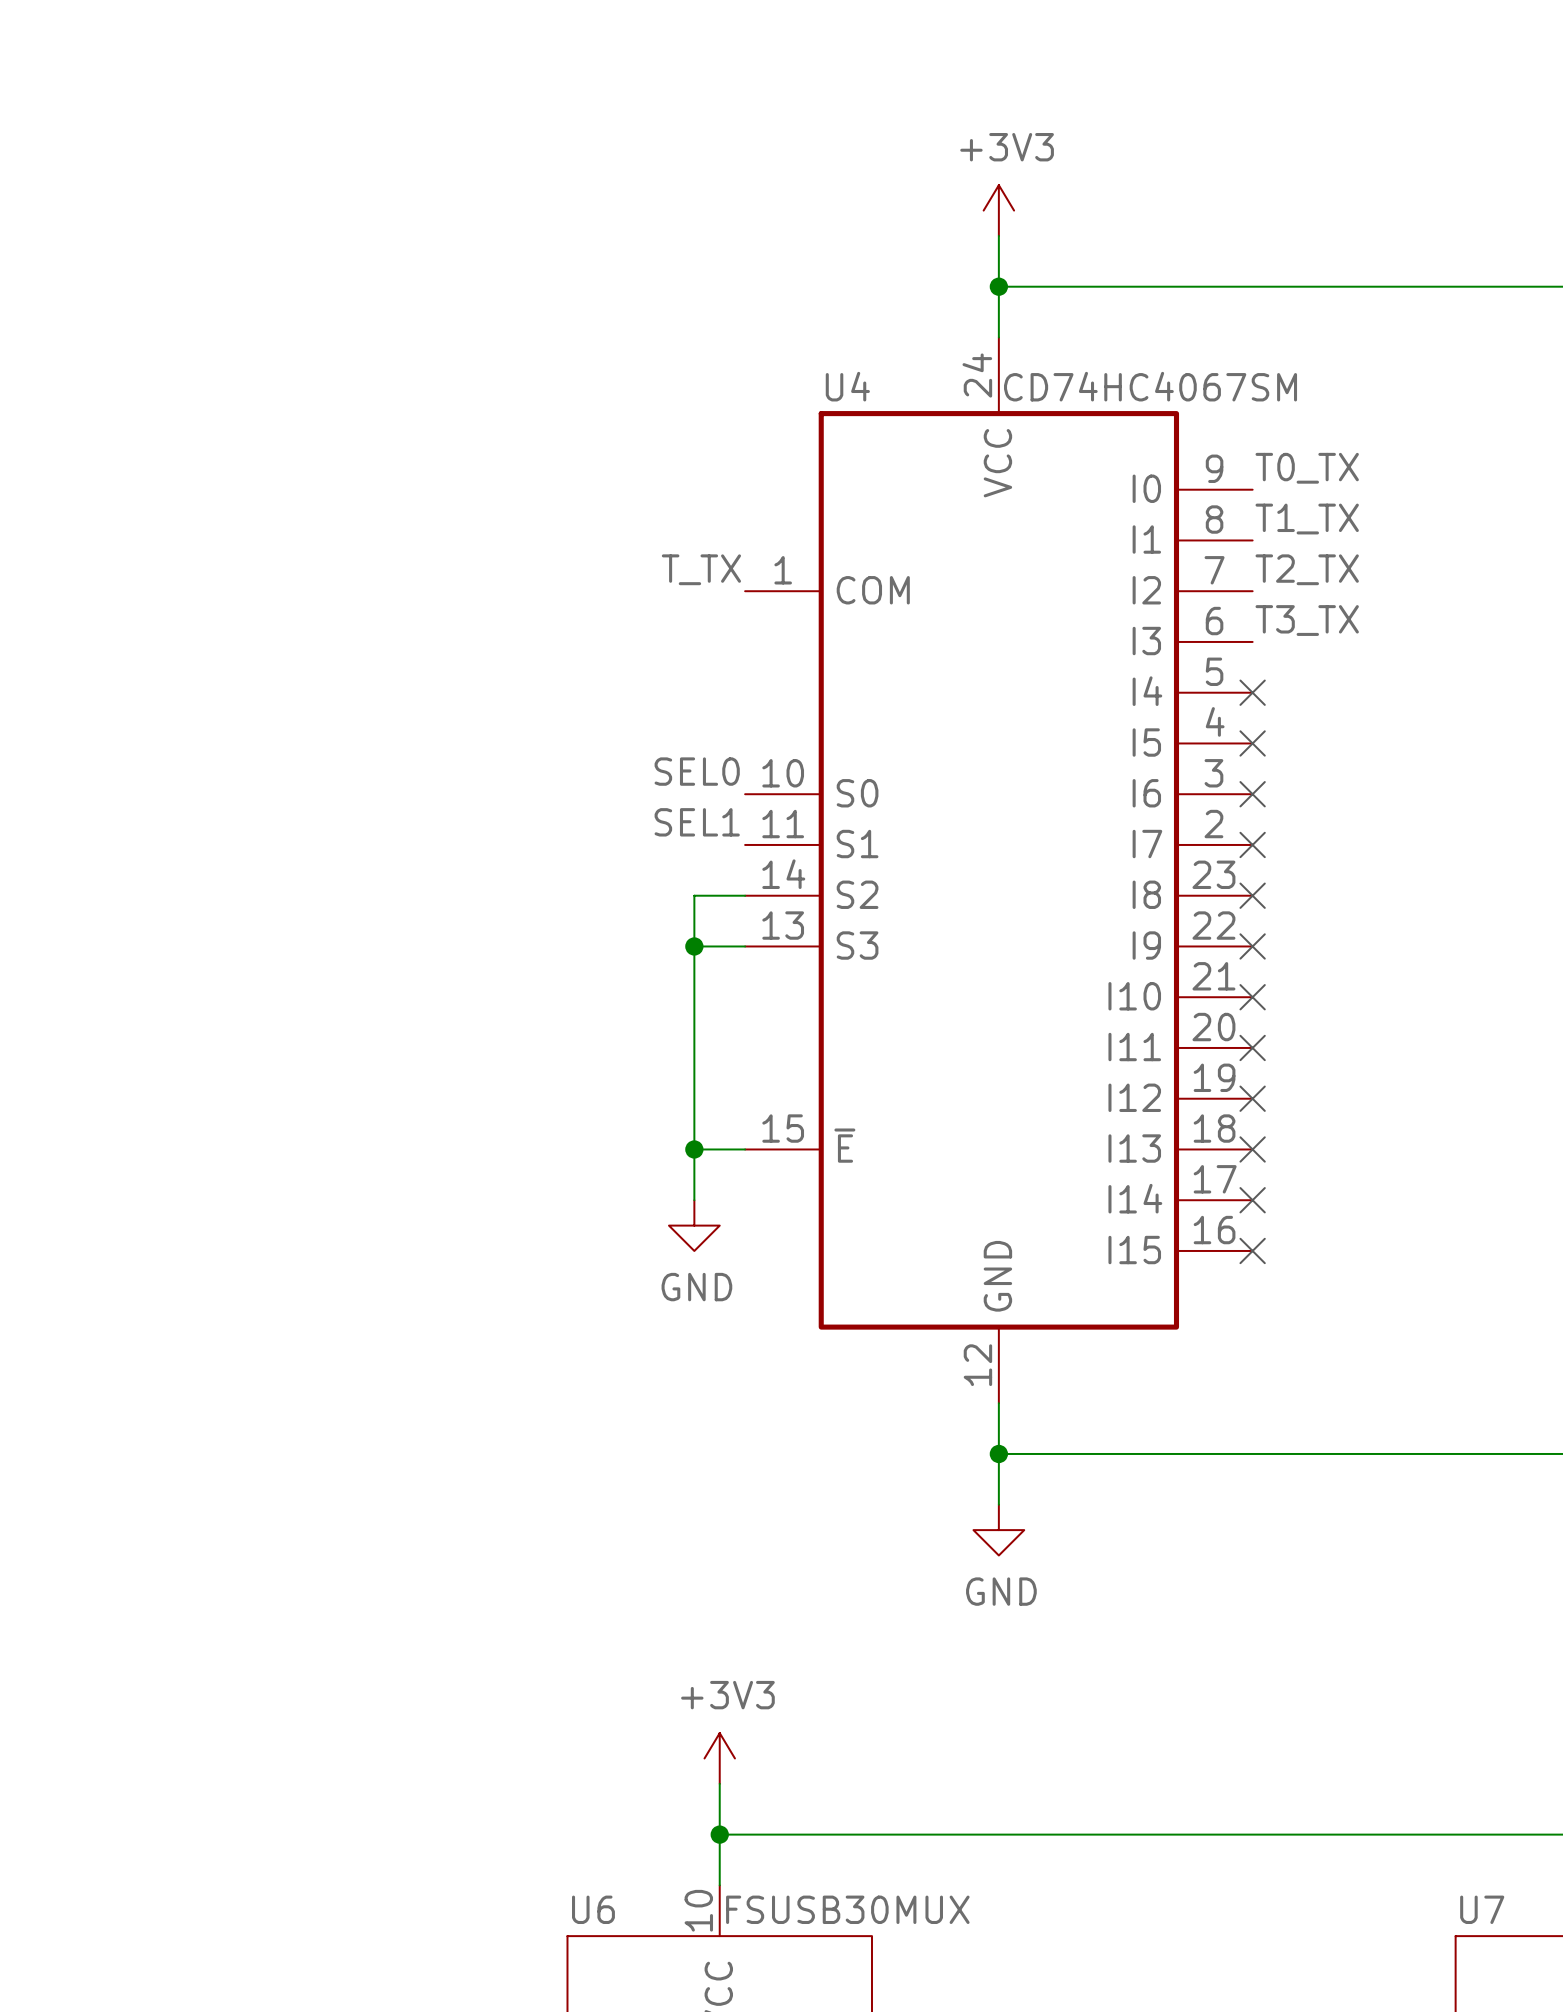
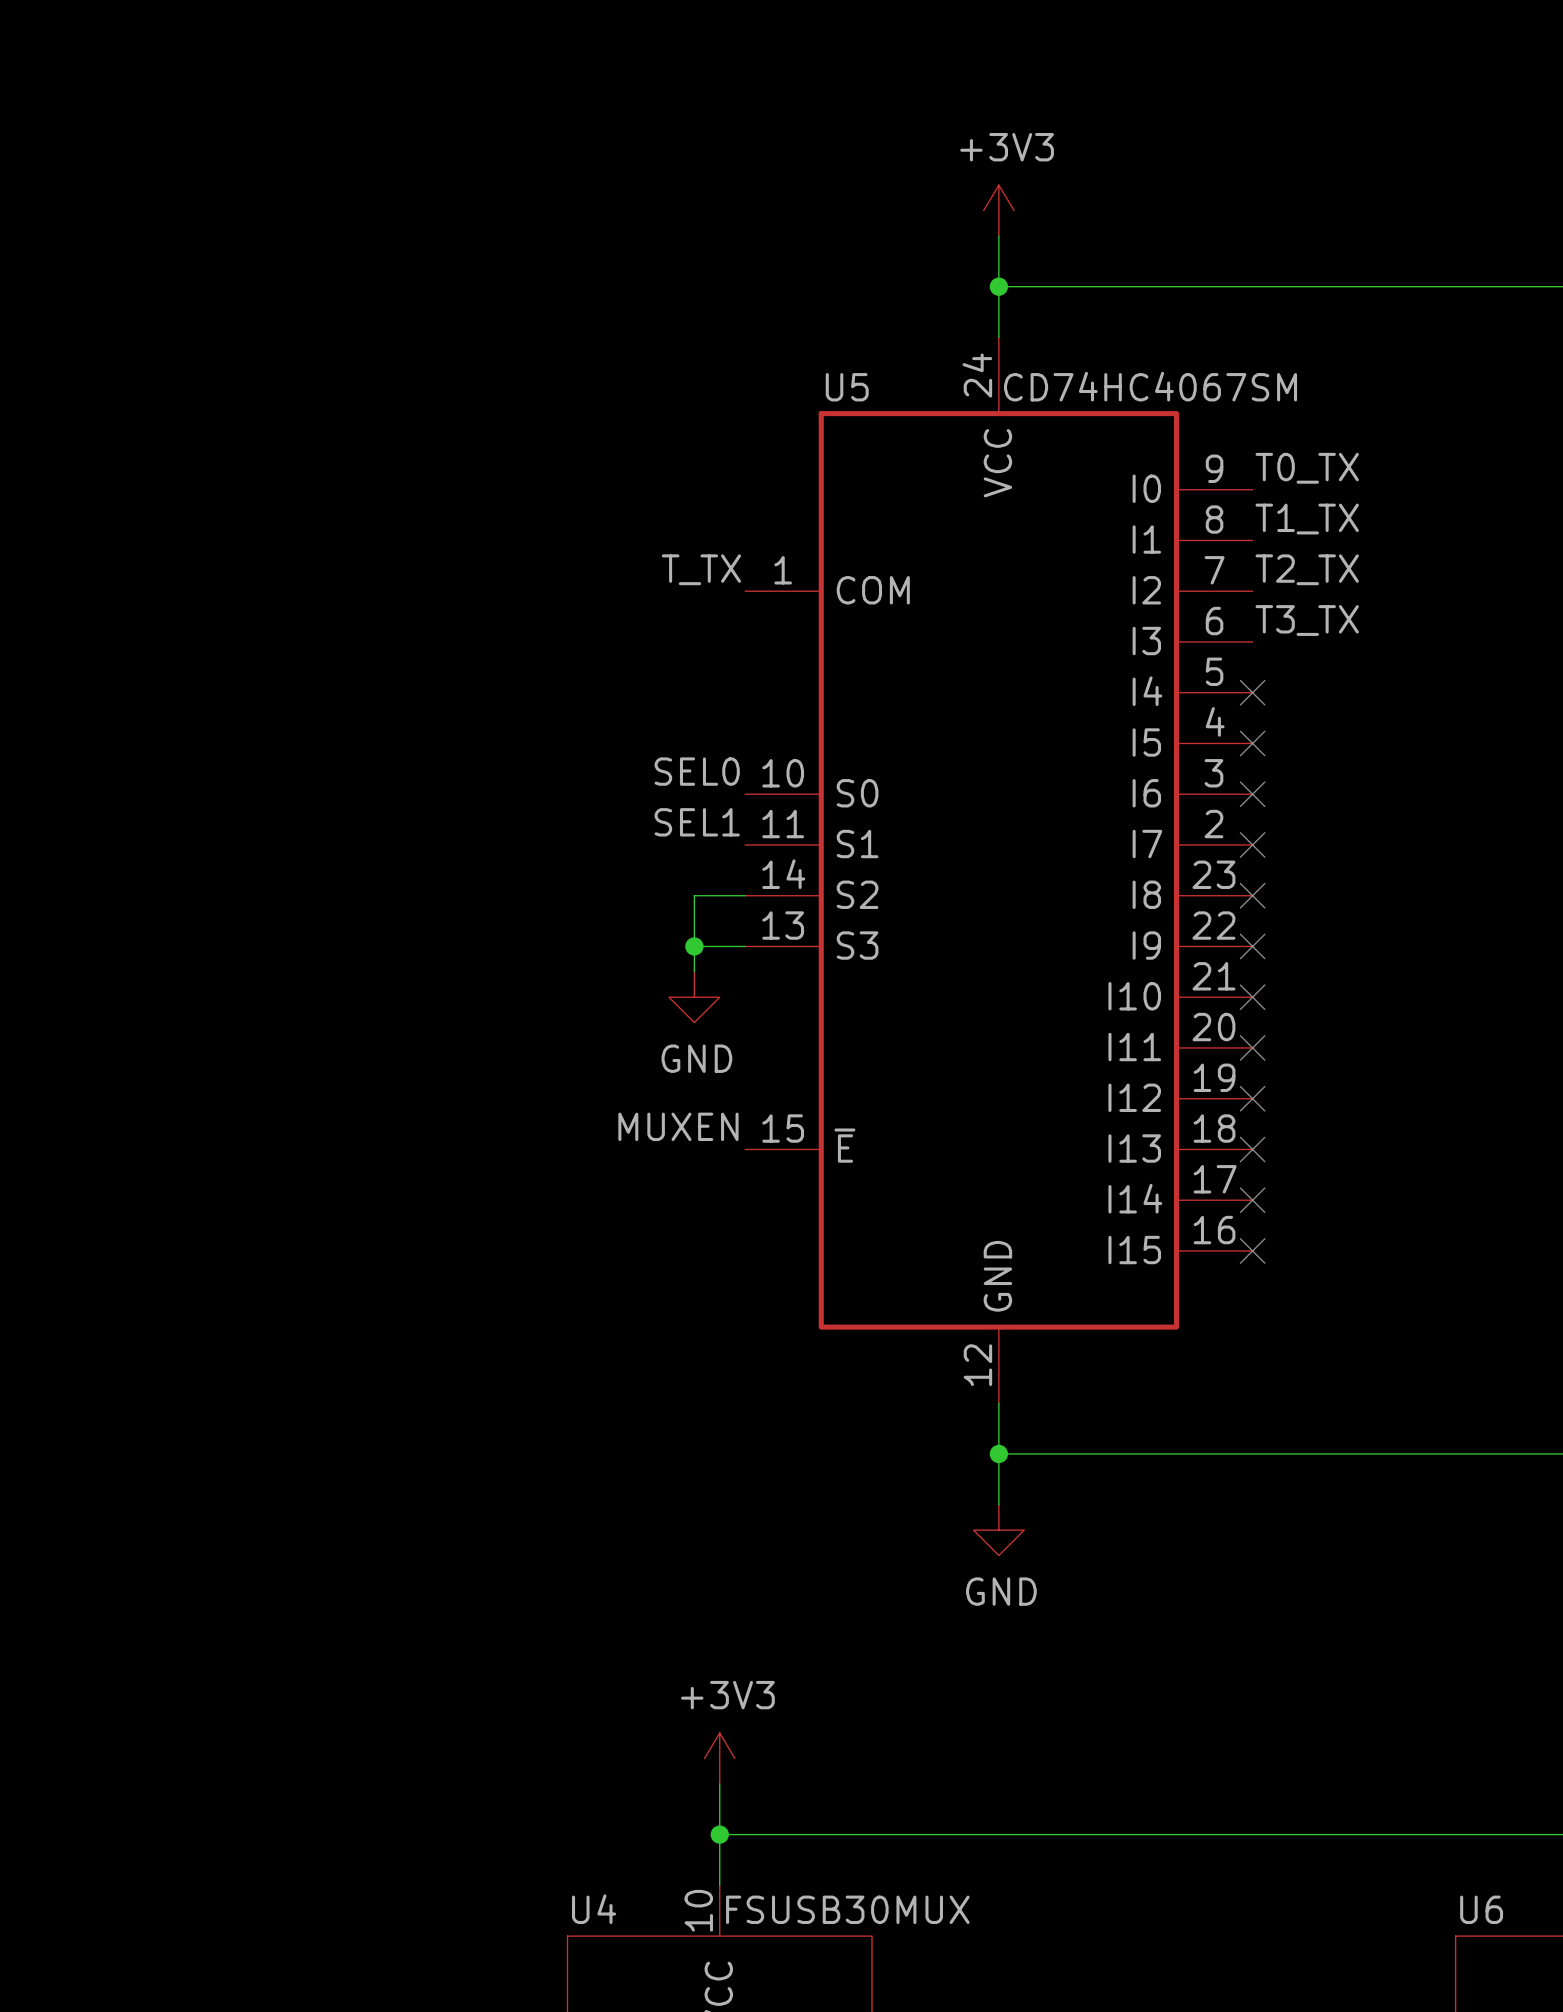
U4 name: U4 (847, 386) -> U5 (847, 387)
wire: (694, 971) (694, 1200) -> none
label: none -> MUXEN (678, 1126)
wire: (694, 1149) (745, 1149) -> none
junction: (694, 1149) -> none
power symbol position: GND (694, 1225) -> GND (694, 997)
U6 name: U6 (593, 1909) -> U4 (594, 1909)
U7 name: U7 (1482, 1909) -> U6 (1481, 1909)

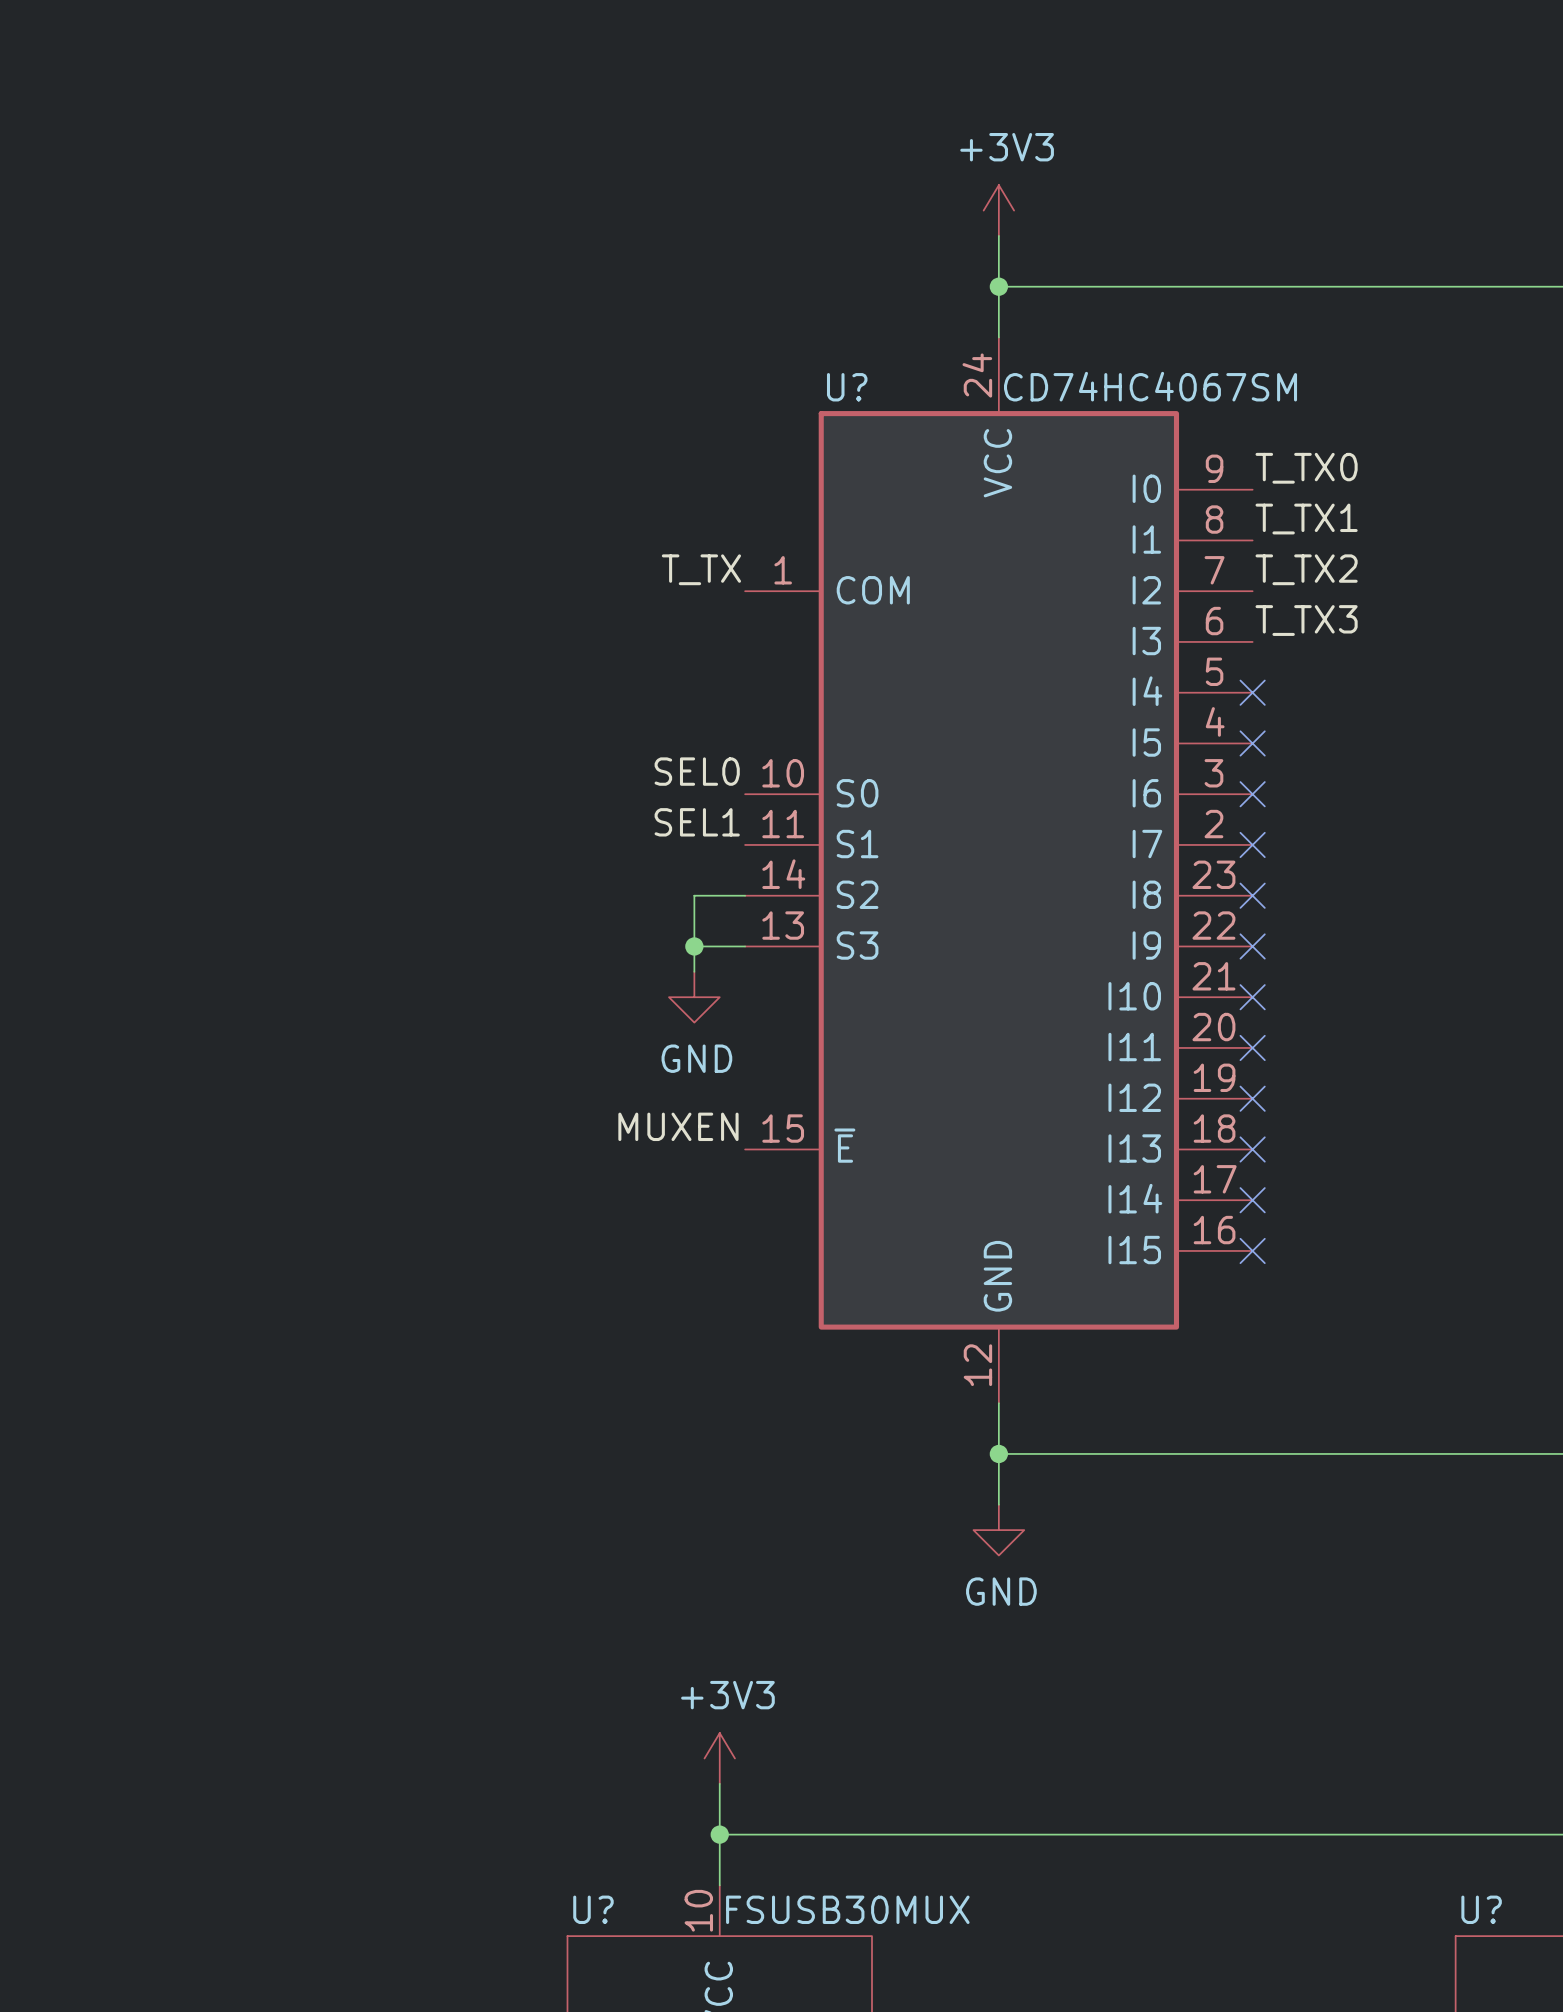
U5 name: U5 (847, 387) -> U? (847, 387)
label: T0_TX (1307, 468) -> T_TX0 (1306, 468)
label: T1_TX (1307, 519) -> T_TX1 (1306, 519)
label: T2_TX (1307, 569) -> T_TX2 (1306, 569)
label: T3_TX (1307, 620) -> T_TX3 (1306, 620)
U4 name: U4 (594, 1909) -> U? (593, 1909)
U6 name: U6 (1481, 1909) -> U? (1481, 1909)

